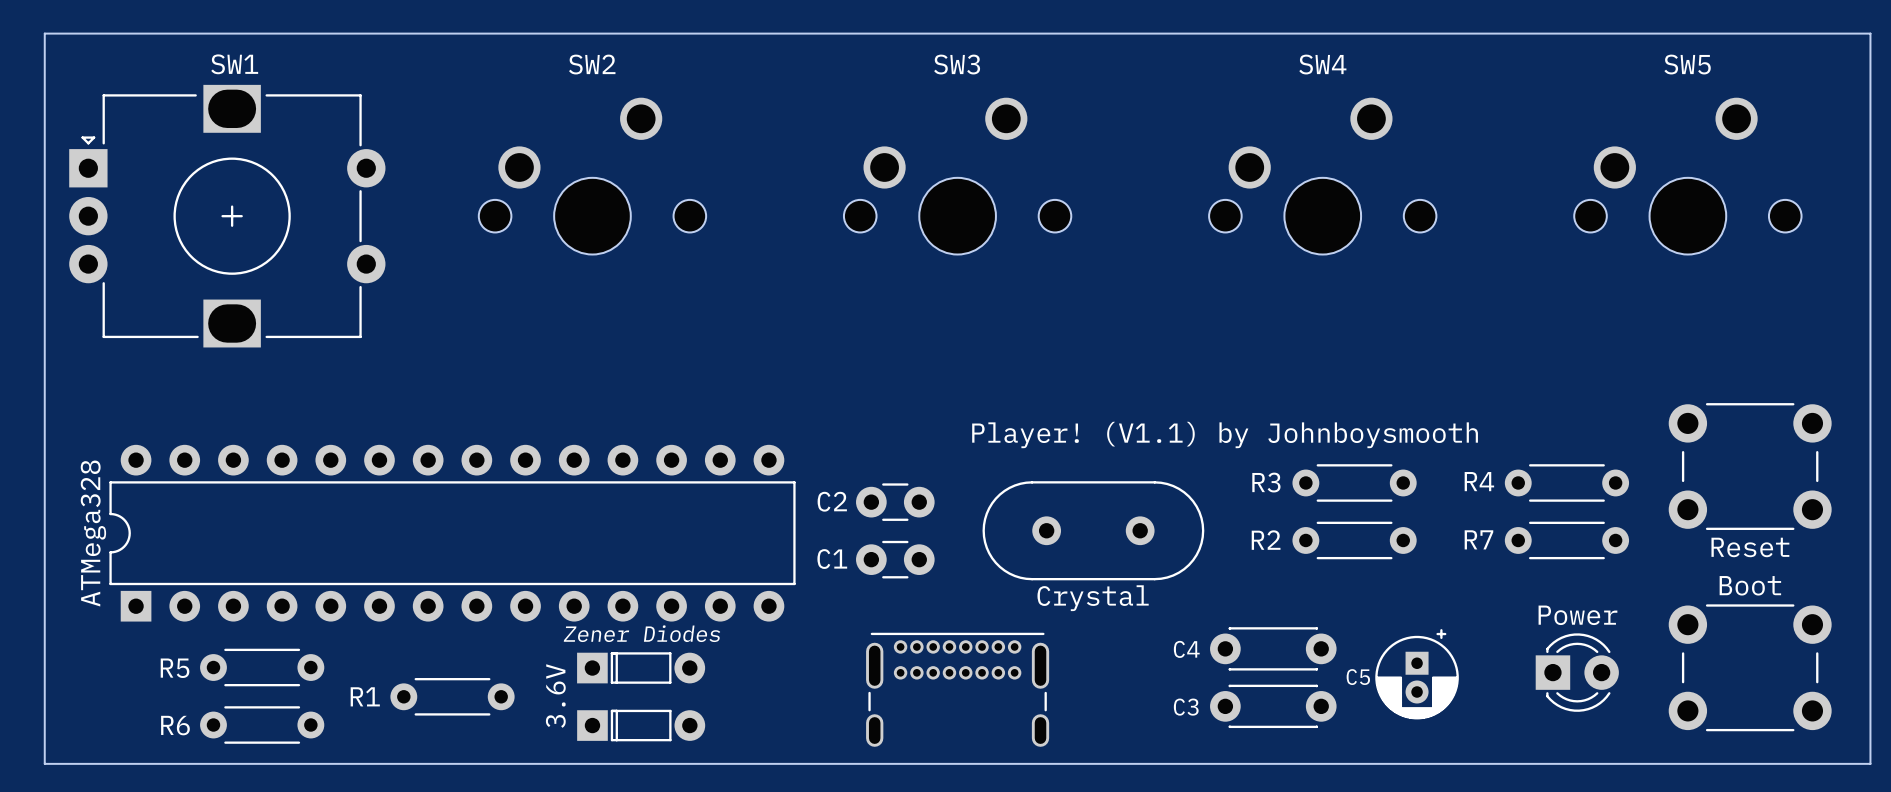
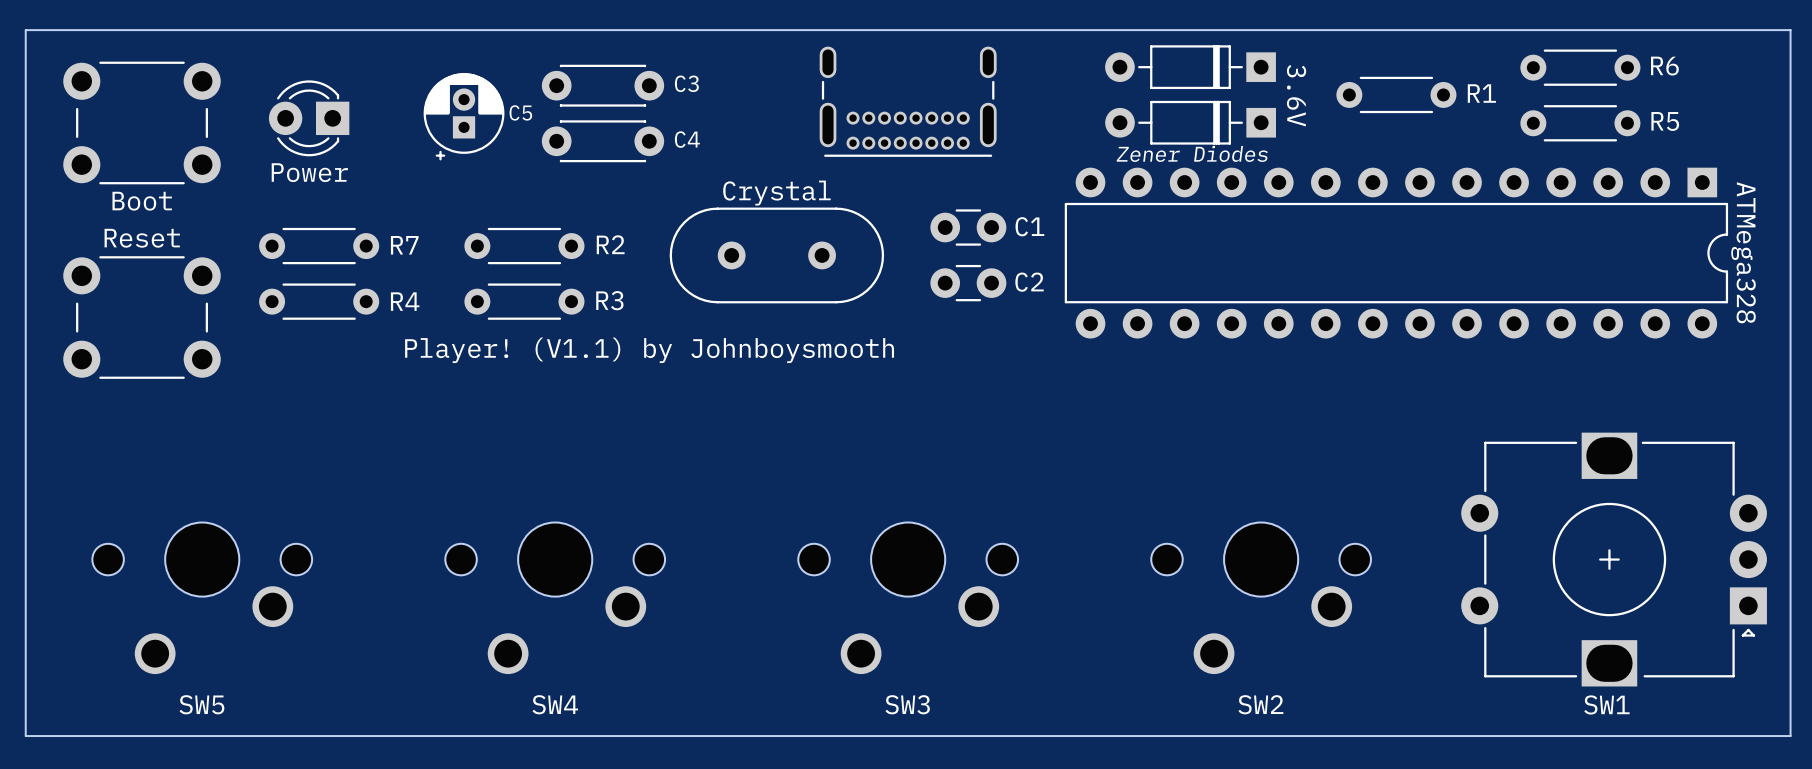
part: none -> (1190, 67)
text: none -> 3.6V (1296, 95)
part: none -> (908, 101)
Power: none -> (309, 118)
Boot: none -> (142, 122)
part: none -> (1190, 122)
text: none -> Zener Diodes (1192, 153)
SW2 rotation: 0° (592, 176) -> 180° (1261, 598)
SW2 position: (592, 176) -> (1261, 598)
SW3 rotation: 0° (957, 176) -> 180° (908, 598)
SW3 position: (957, 176) -> (908, 598)
SW4 rotation: 0° (1322, 176) -> 180° (555, 598)
SW4 position: (1322, 176) -> (555, 598)
SW5 rotation: 0° (1687, 176) -> 180° (202, 598)
SW5 position: (1687, 176) -> (202, 598)
SW1 rotation: 0° (227, 216) -> 180° (1614, 559)
SW1 position: (227, 216) -> (1614, 559)
Reset: none -> (142, 317)
text: none -> Player! (V1.1) by Johnboysmooth (649, 350)
text: Player! (V1.1) by Johnboysmooth (1225, 434) -> none
Reset: (1750, 466) -> none
R4 name position: R4 (1479, 481) -> R4 (405, 301)
R3 name position: R3 (1266, 482) -> R3 (609, 300)
R3 position: (1354, 482) -> (524, 301)
R4 position: (1566, 482) -> (319, 301)
C2 name position: C2 (832, 501) -> C2 (1029, 282)
C2 position: (895, 502) -> (968, 283)
part rotation: 0° (1093, 530) -> 180° (776, 255)
part position: (1093, 530) -> (776, 255)
ATMega328 rotation: 0° (452, 533) -> 180° (1396, 253)
ATMega328 position: (452, 533) -> (1396, 253)
R7 name position: R7 (1478, 539) -> R7 (404, 245)
R2 name position: R2 (1266, 540) -> R2 (610, 244)
R2 position: (1354, 540) -> (524, 246)
R7 position: (1566, 540) -> (319, 246)
C1 name position: C1 (832, 559) -> C1 (1029, 226)
C1 position: (895, 559) -> (968, 227)
text: Zener Diodes (642, 633) -> none
C4 position: (1273, 648) -> (602, 141)
C4 name position: C4 (1186, 649) -> C4 (687, 139)
R5 position: (262, 667) -> (1580, 123)
Boot: (1750, 667) -> none
R5 name position: R5 (175, 668) -> R5 (1665, 121)
part: (641, 668) -> none
Power: (1577, 672) -> none
C5 rotation: 0° (1417, 674) -> 180° (464, 116)
C5 position: (1417, 674) -> (464, 116)
part: (957, 689) -> none
R1 name position: R1 (365, 696) -> R1 (1481, 93)
R1 position: (452, 696) -> (1396, 94)
text: 3.6V (555, 696) -> none
C3 position: (1273, 706) -> (602, 85)
C3 name position: C3 (1186, 707) -> C3 (686, 83)
R6 name position: R6 (175, 725) -> R6 (1664, 66)
R6 position: (262, 725) -> (1580, 67)
part: (641, 725) -> none

